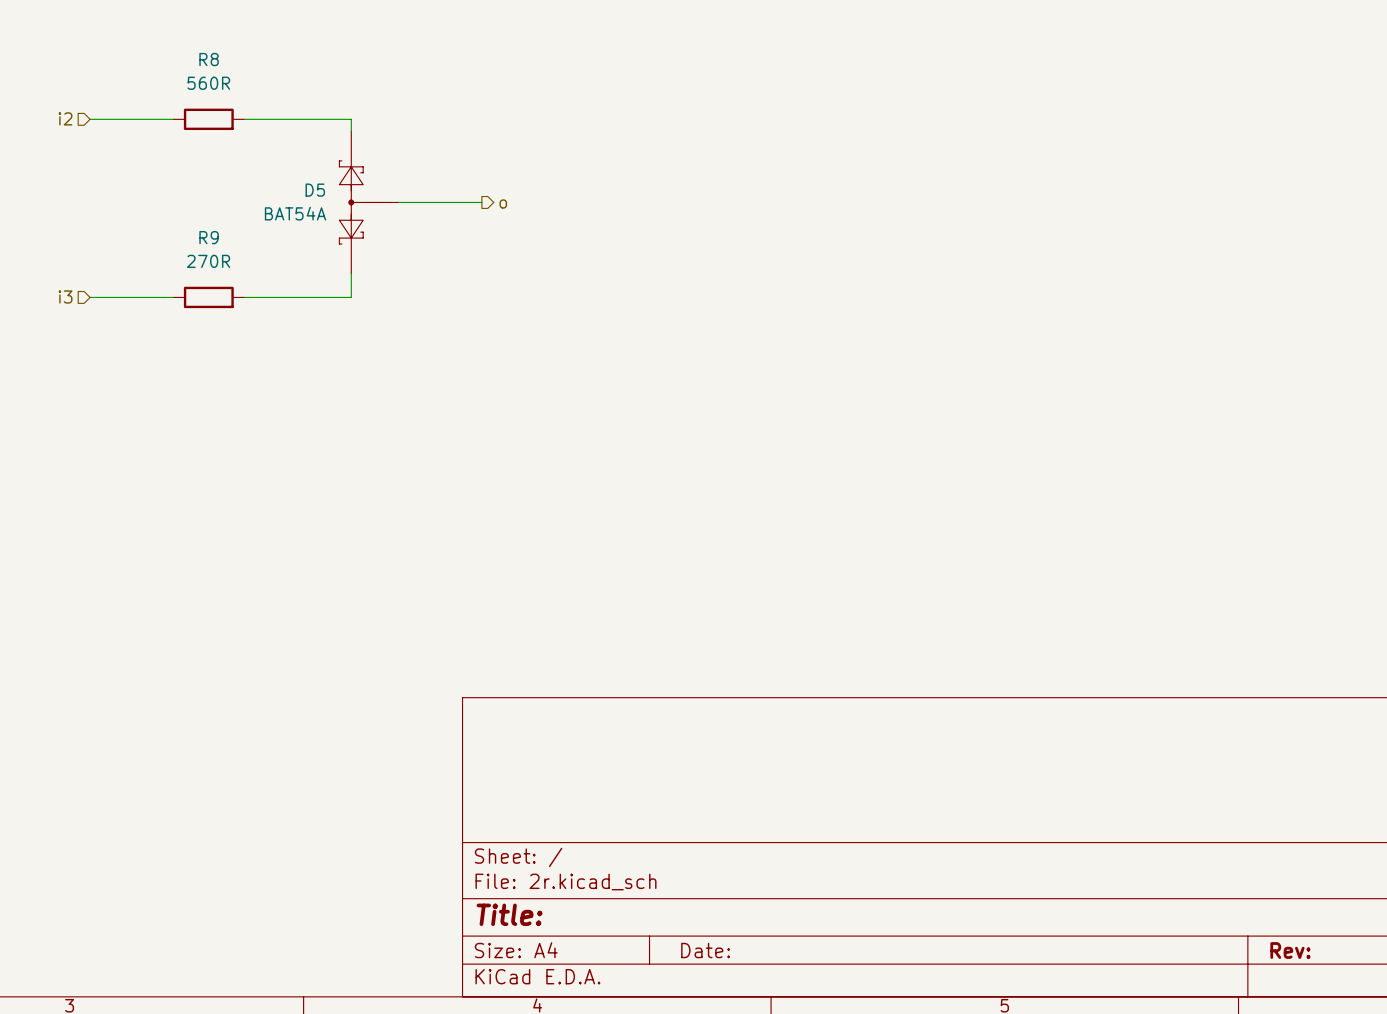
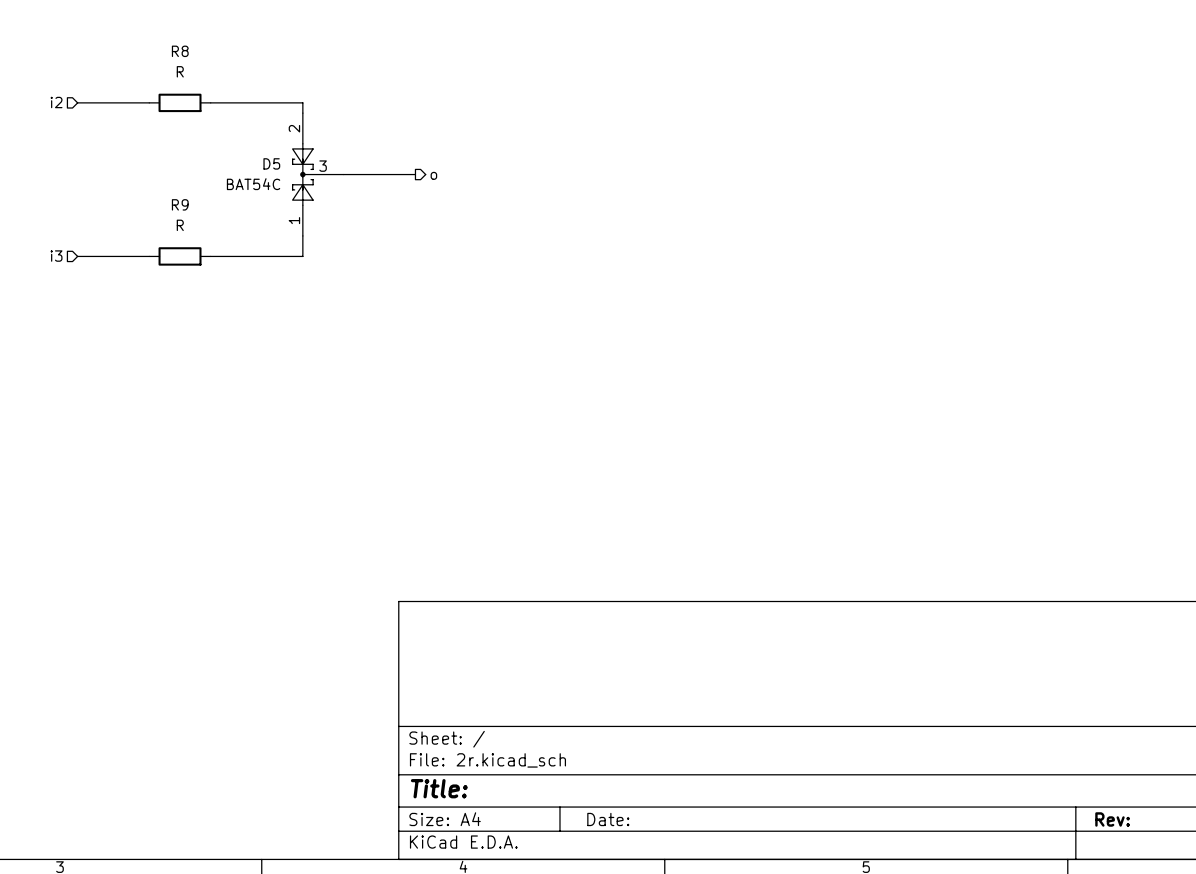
R8 value: 560R (208, 83) -> R (180, 71)
D5 symbol: [339, 131, 399, 274] -> [292, 113, 344, 236]
D5 value: BAT54A (295, 213) -> BAT54C (253, 184)
R9 value: 270R (208, 261) -> R (180, 225)

